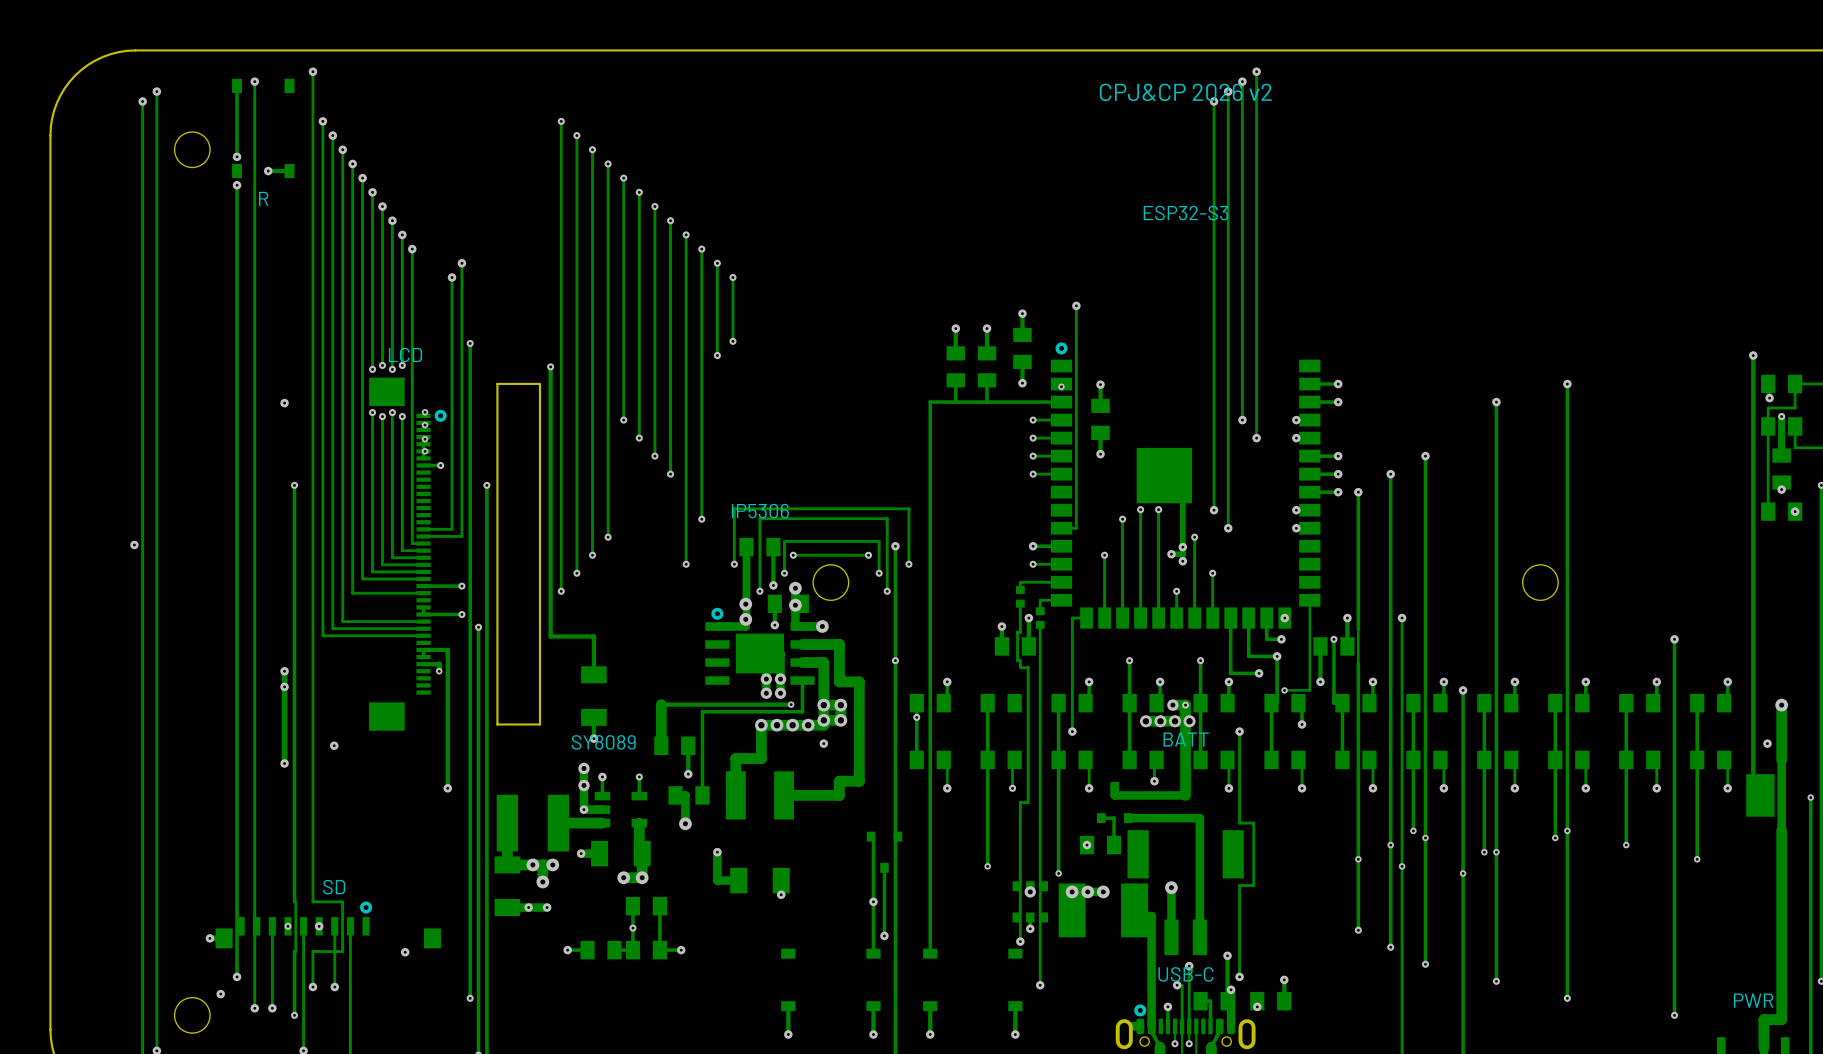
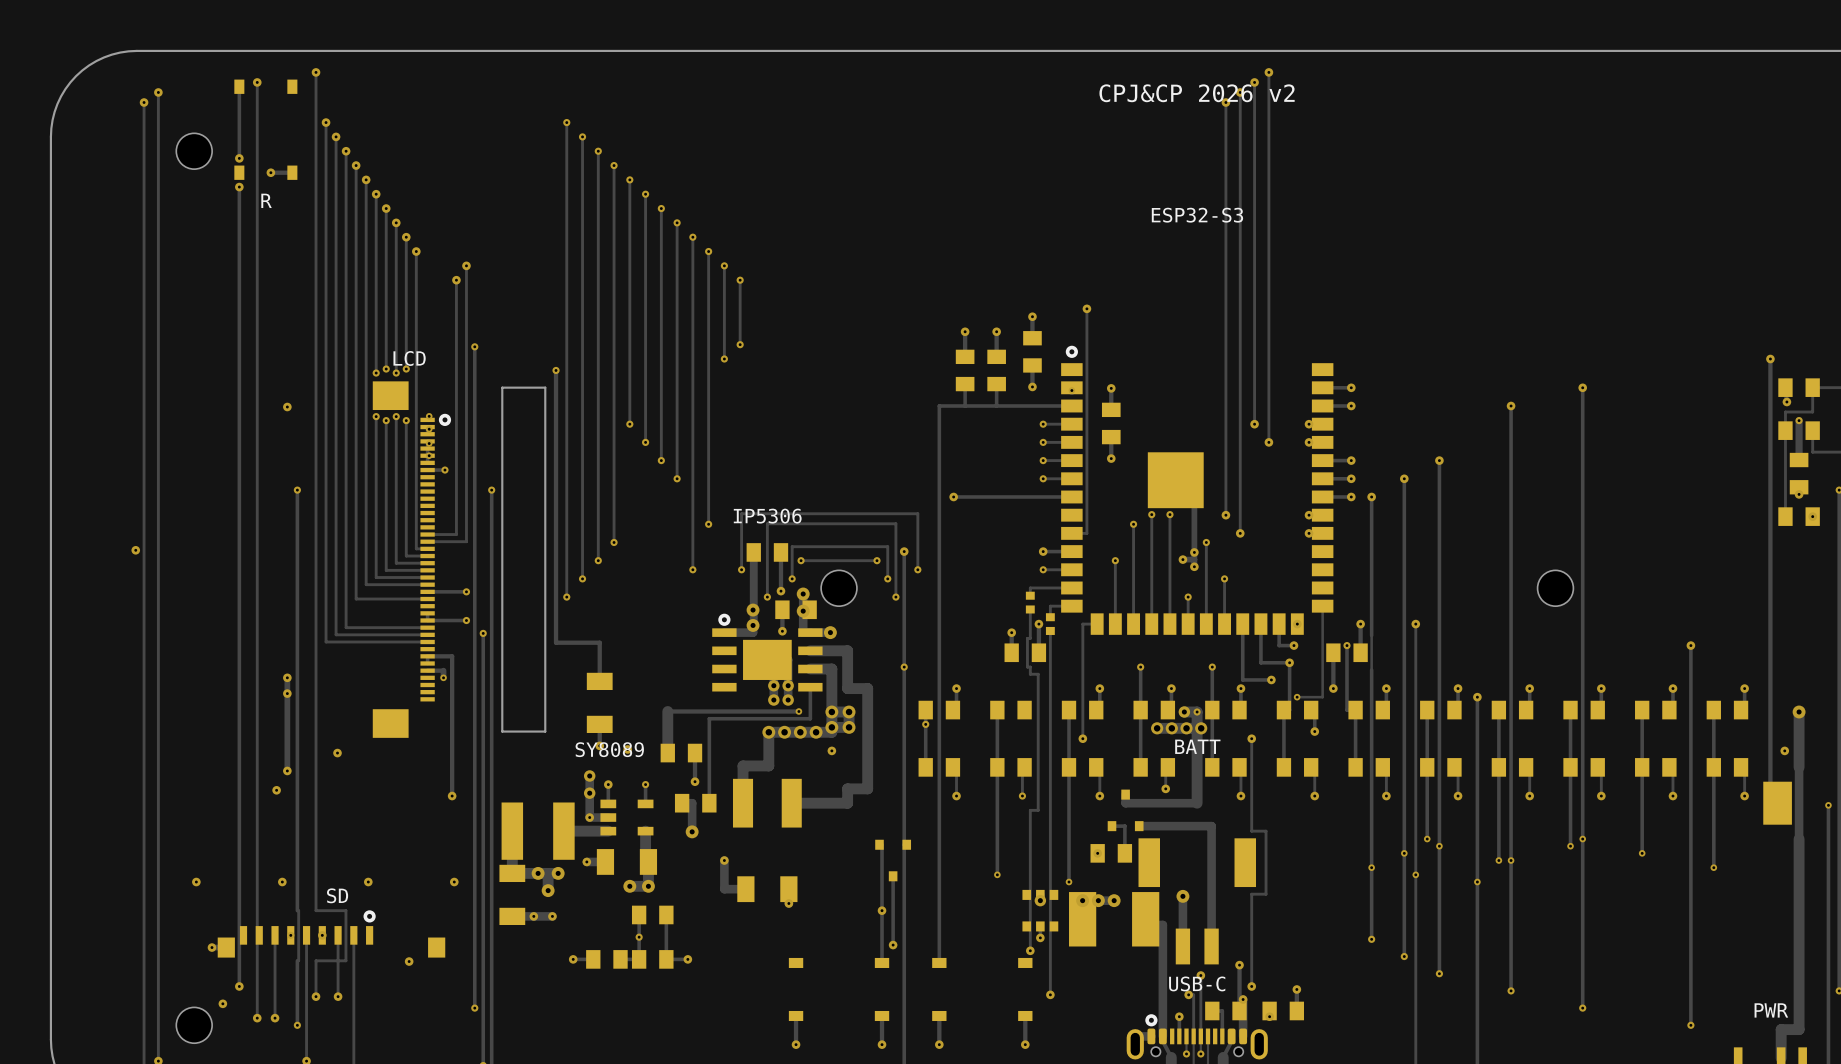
via: none -> (953, 496)
track: none -> (1071, 496) (953, 496)
via: none -> (627, 749)
via: none -> (276, 790)
via: none -> (196, 882)
via: none -> (282, 882)
via: none -> (368, 882)
via: none -> (454, 882)

